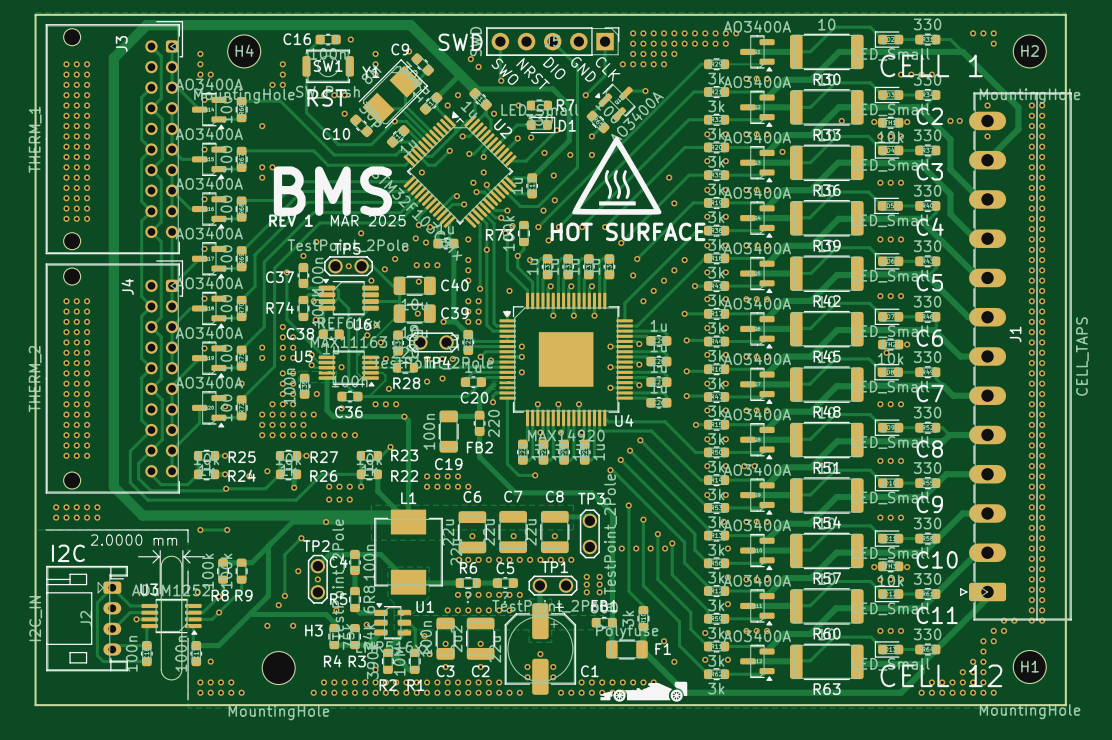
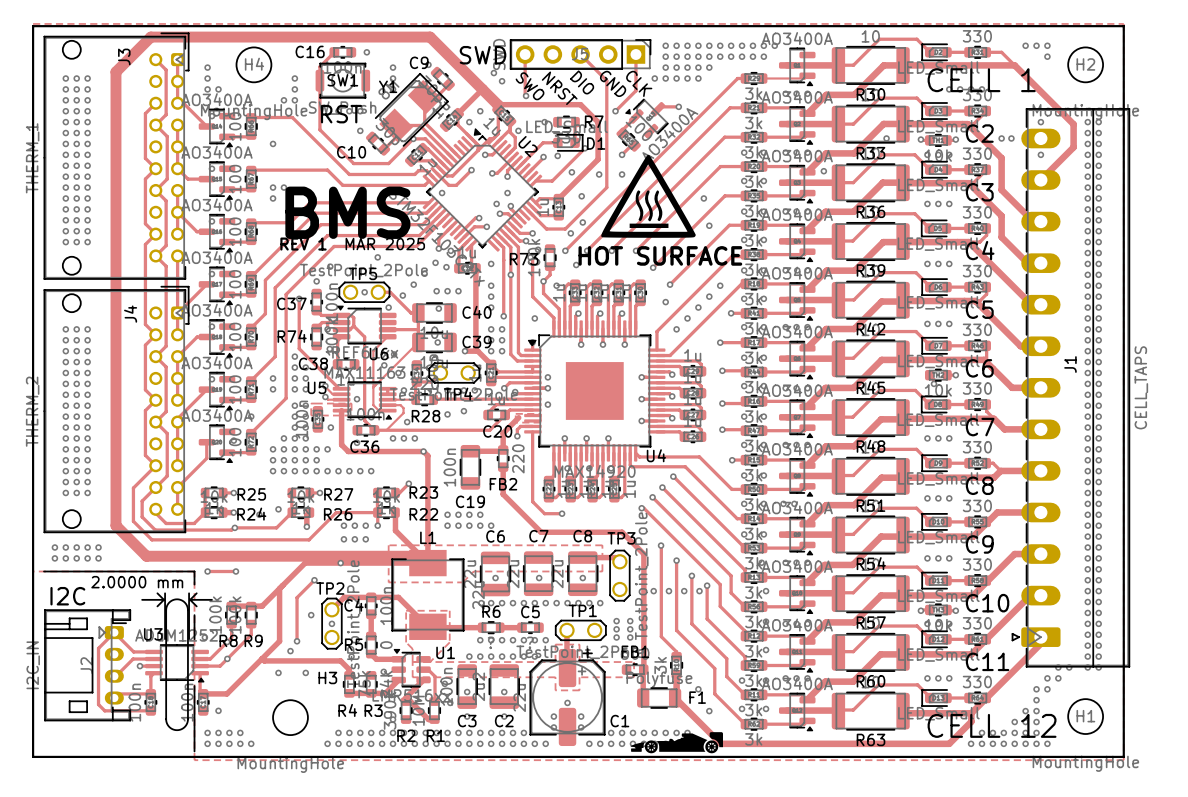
R5 value: 6R8 (369, 599) -> 0 (386, 645)

